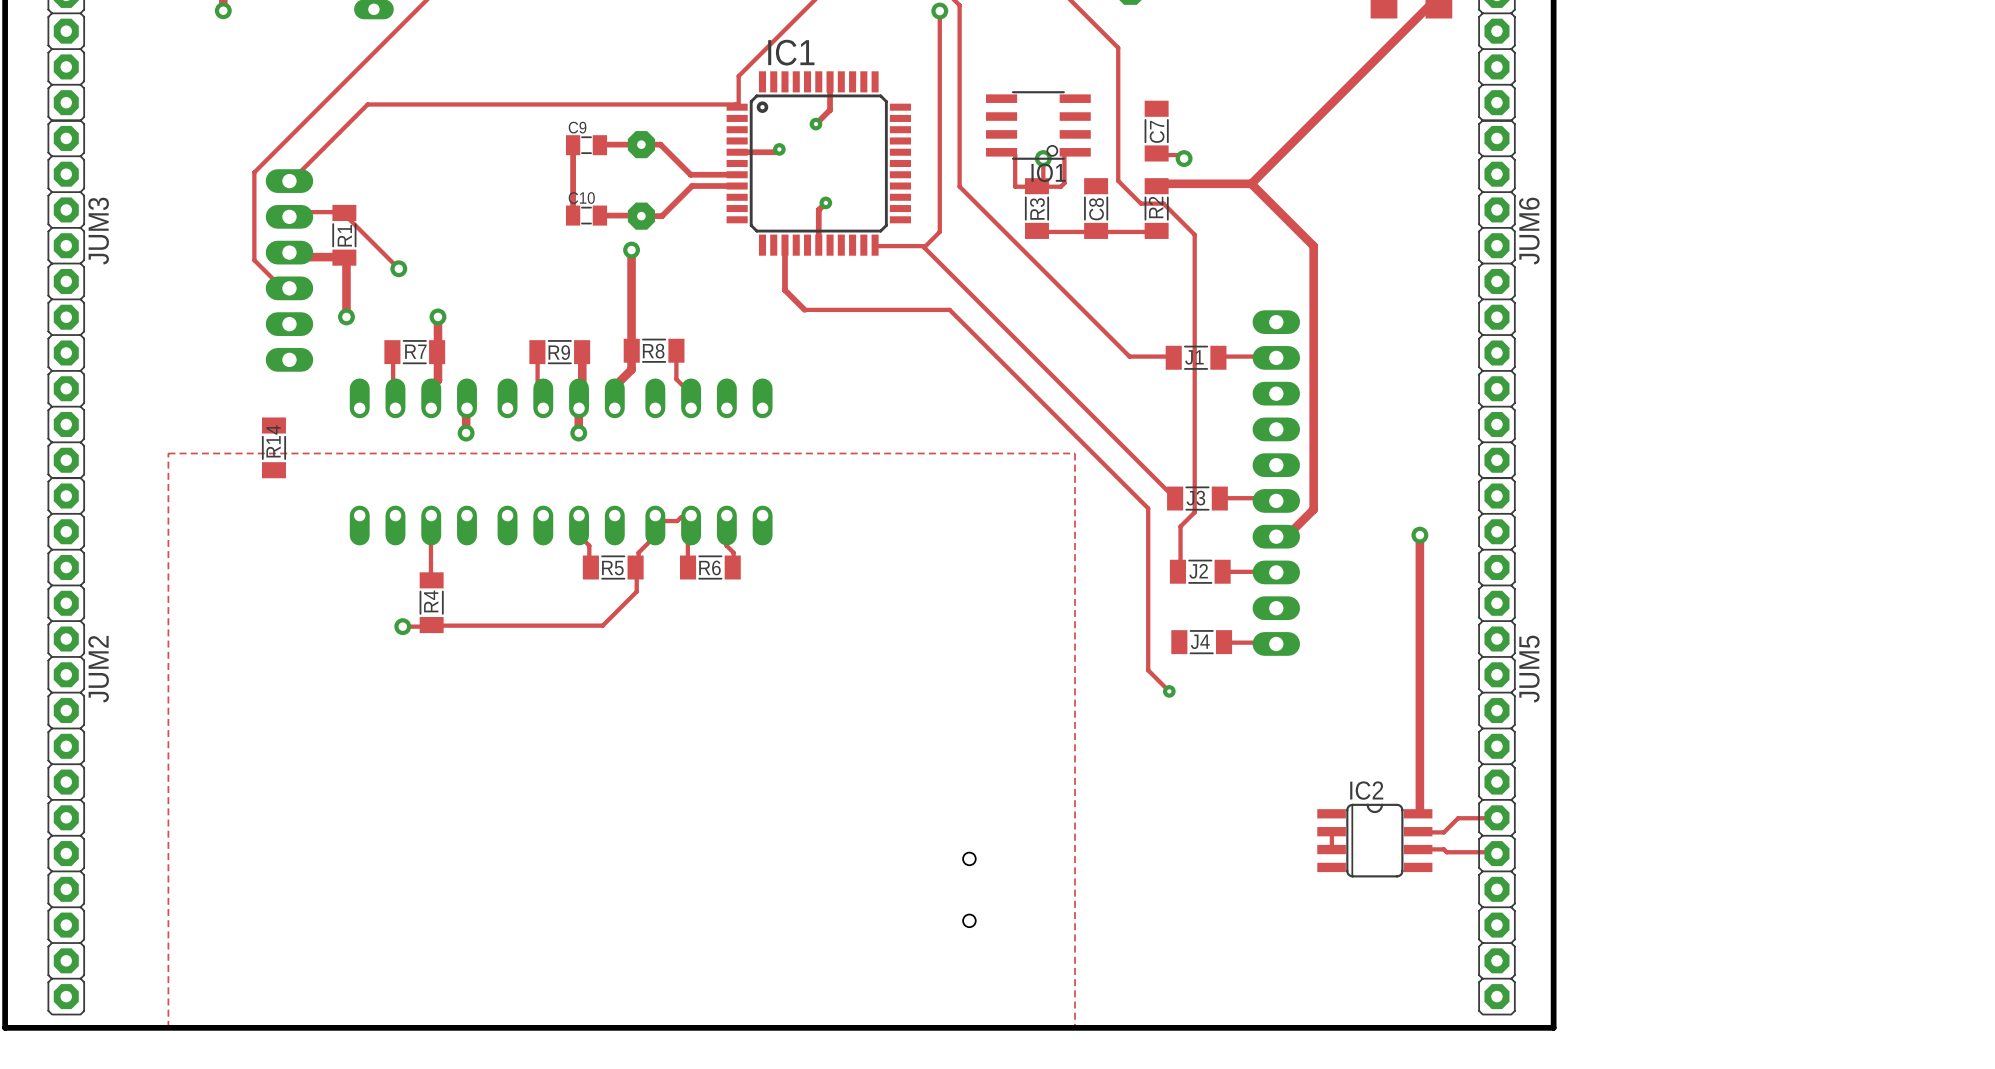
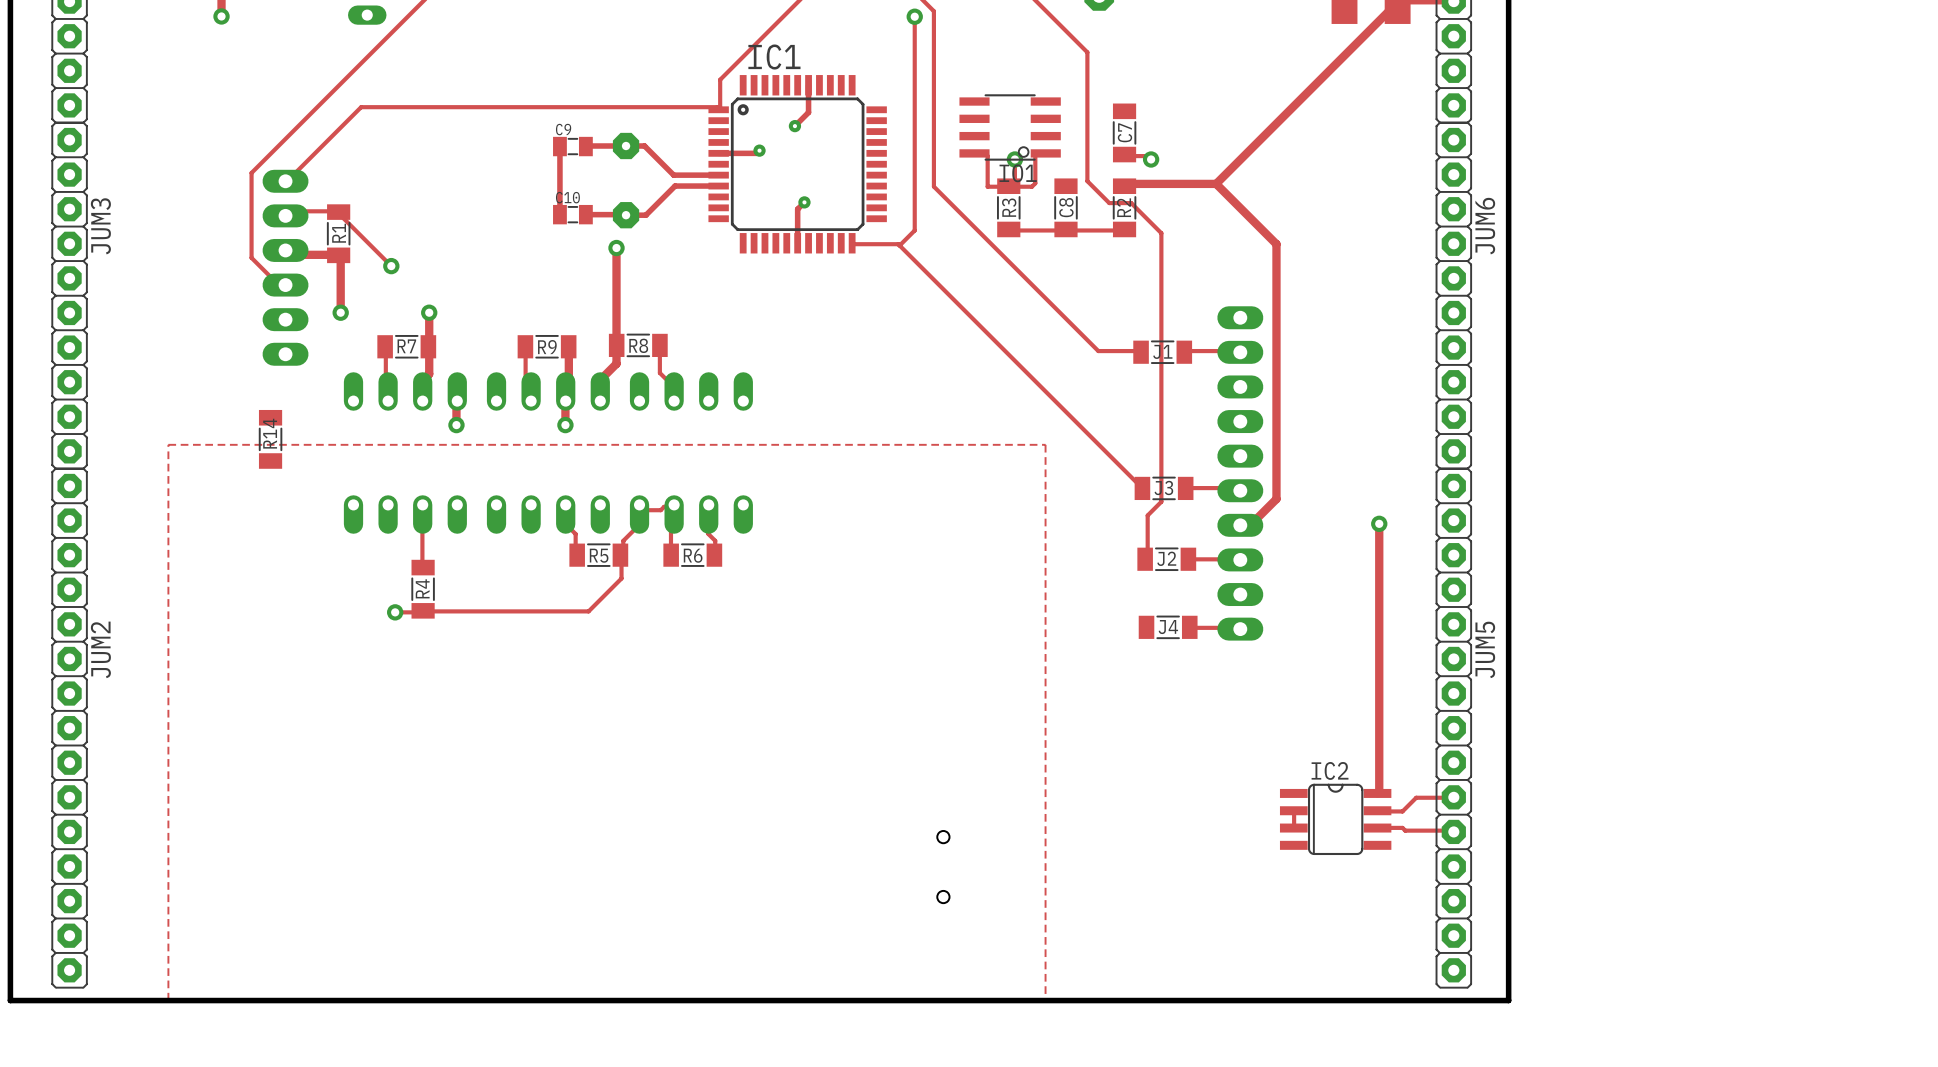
track: (785, 245) (785, 290) (804, 309) (949, 309) (1148, 508) (1148, 670) (1169, 691) -> none
via: (1169, 691) -> none

